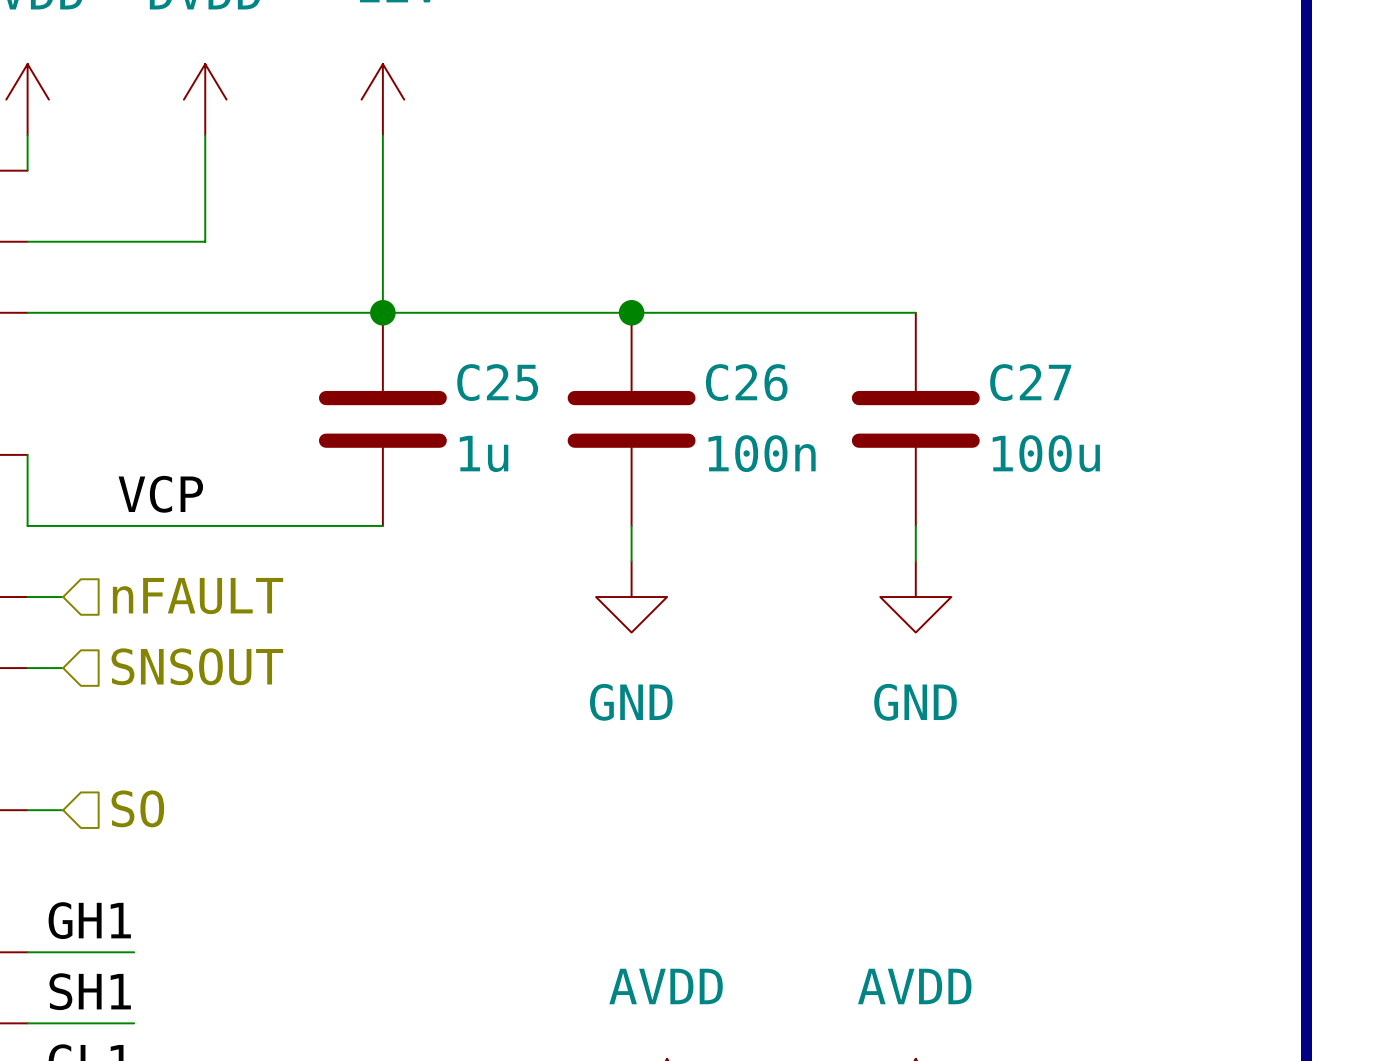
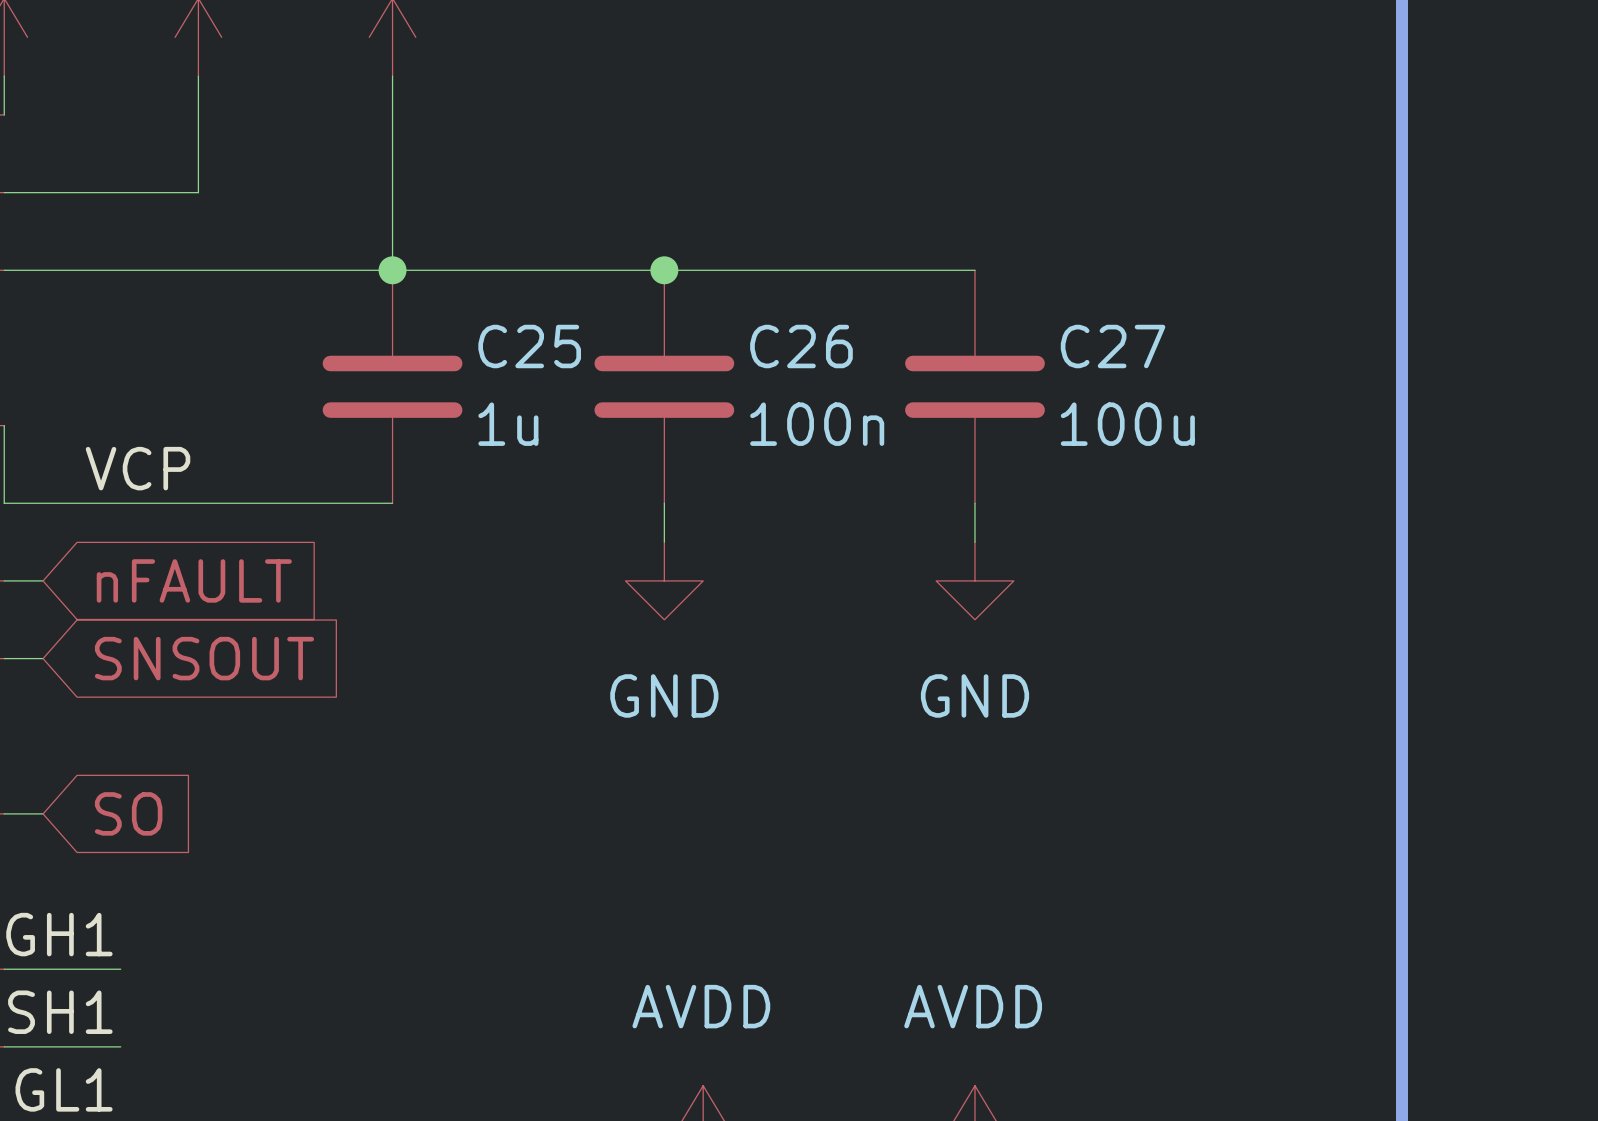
hierarchical label: nFAULT (198, 596) -> none
global label: none -> nFAULT (194, 580)
hierarchical label: SNSOUT (197, 666) -> none
global label: none -> SNSOUT (204, 658)
hierarchical label: SO (137, 808) -> none
global label: none -> SO (128, 813)

